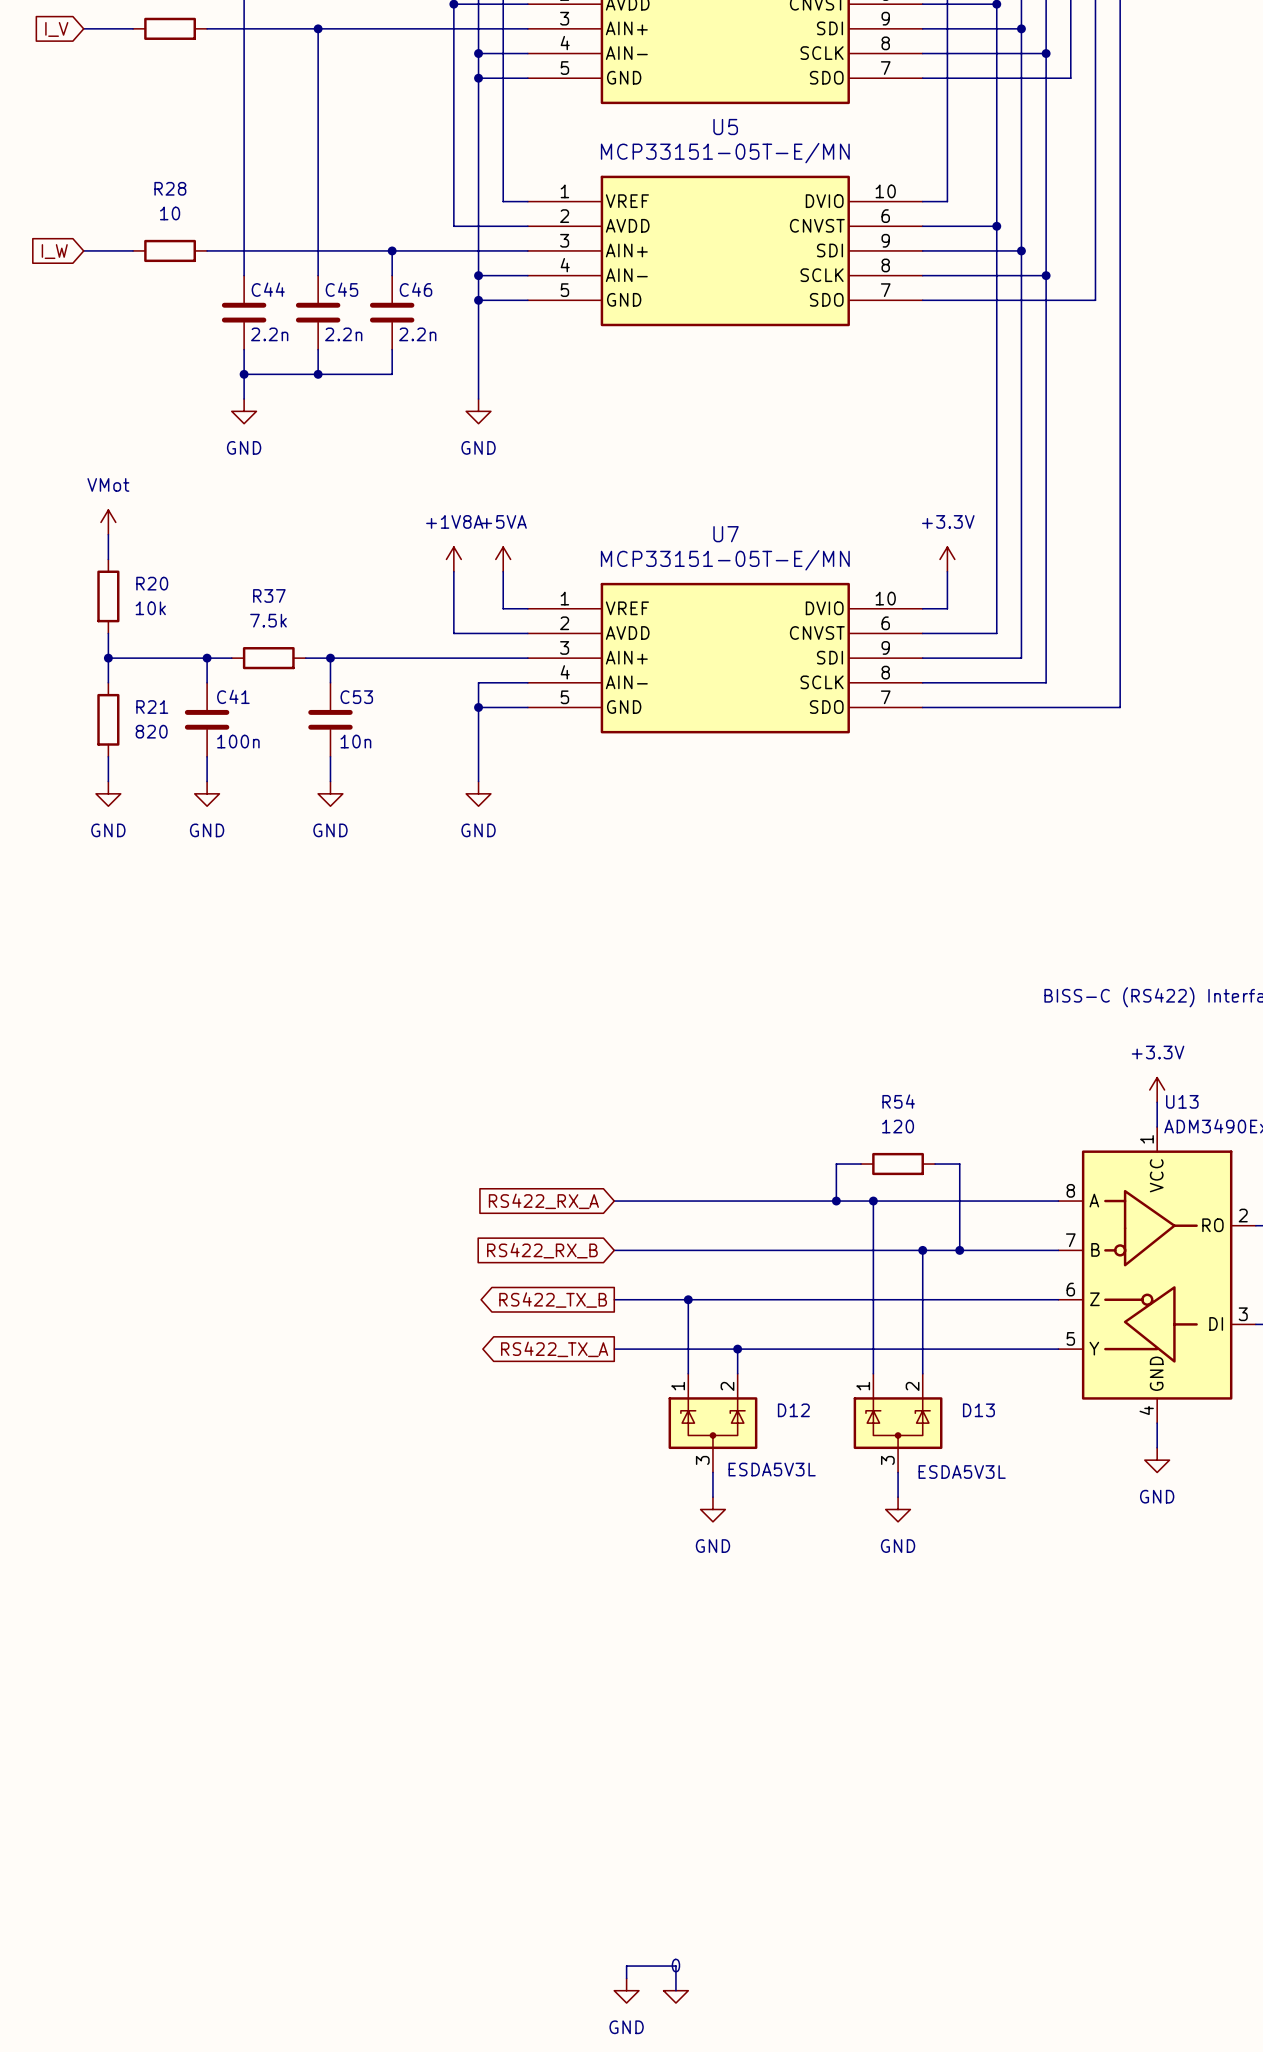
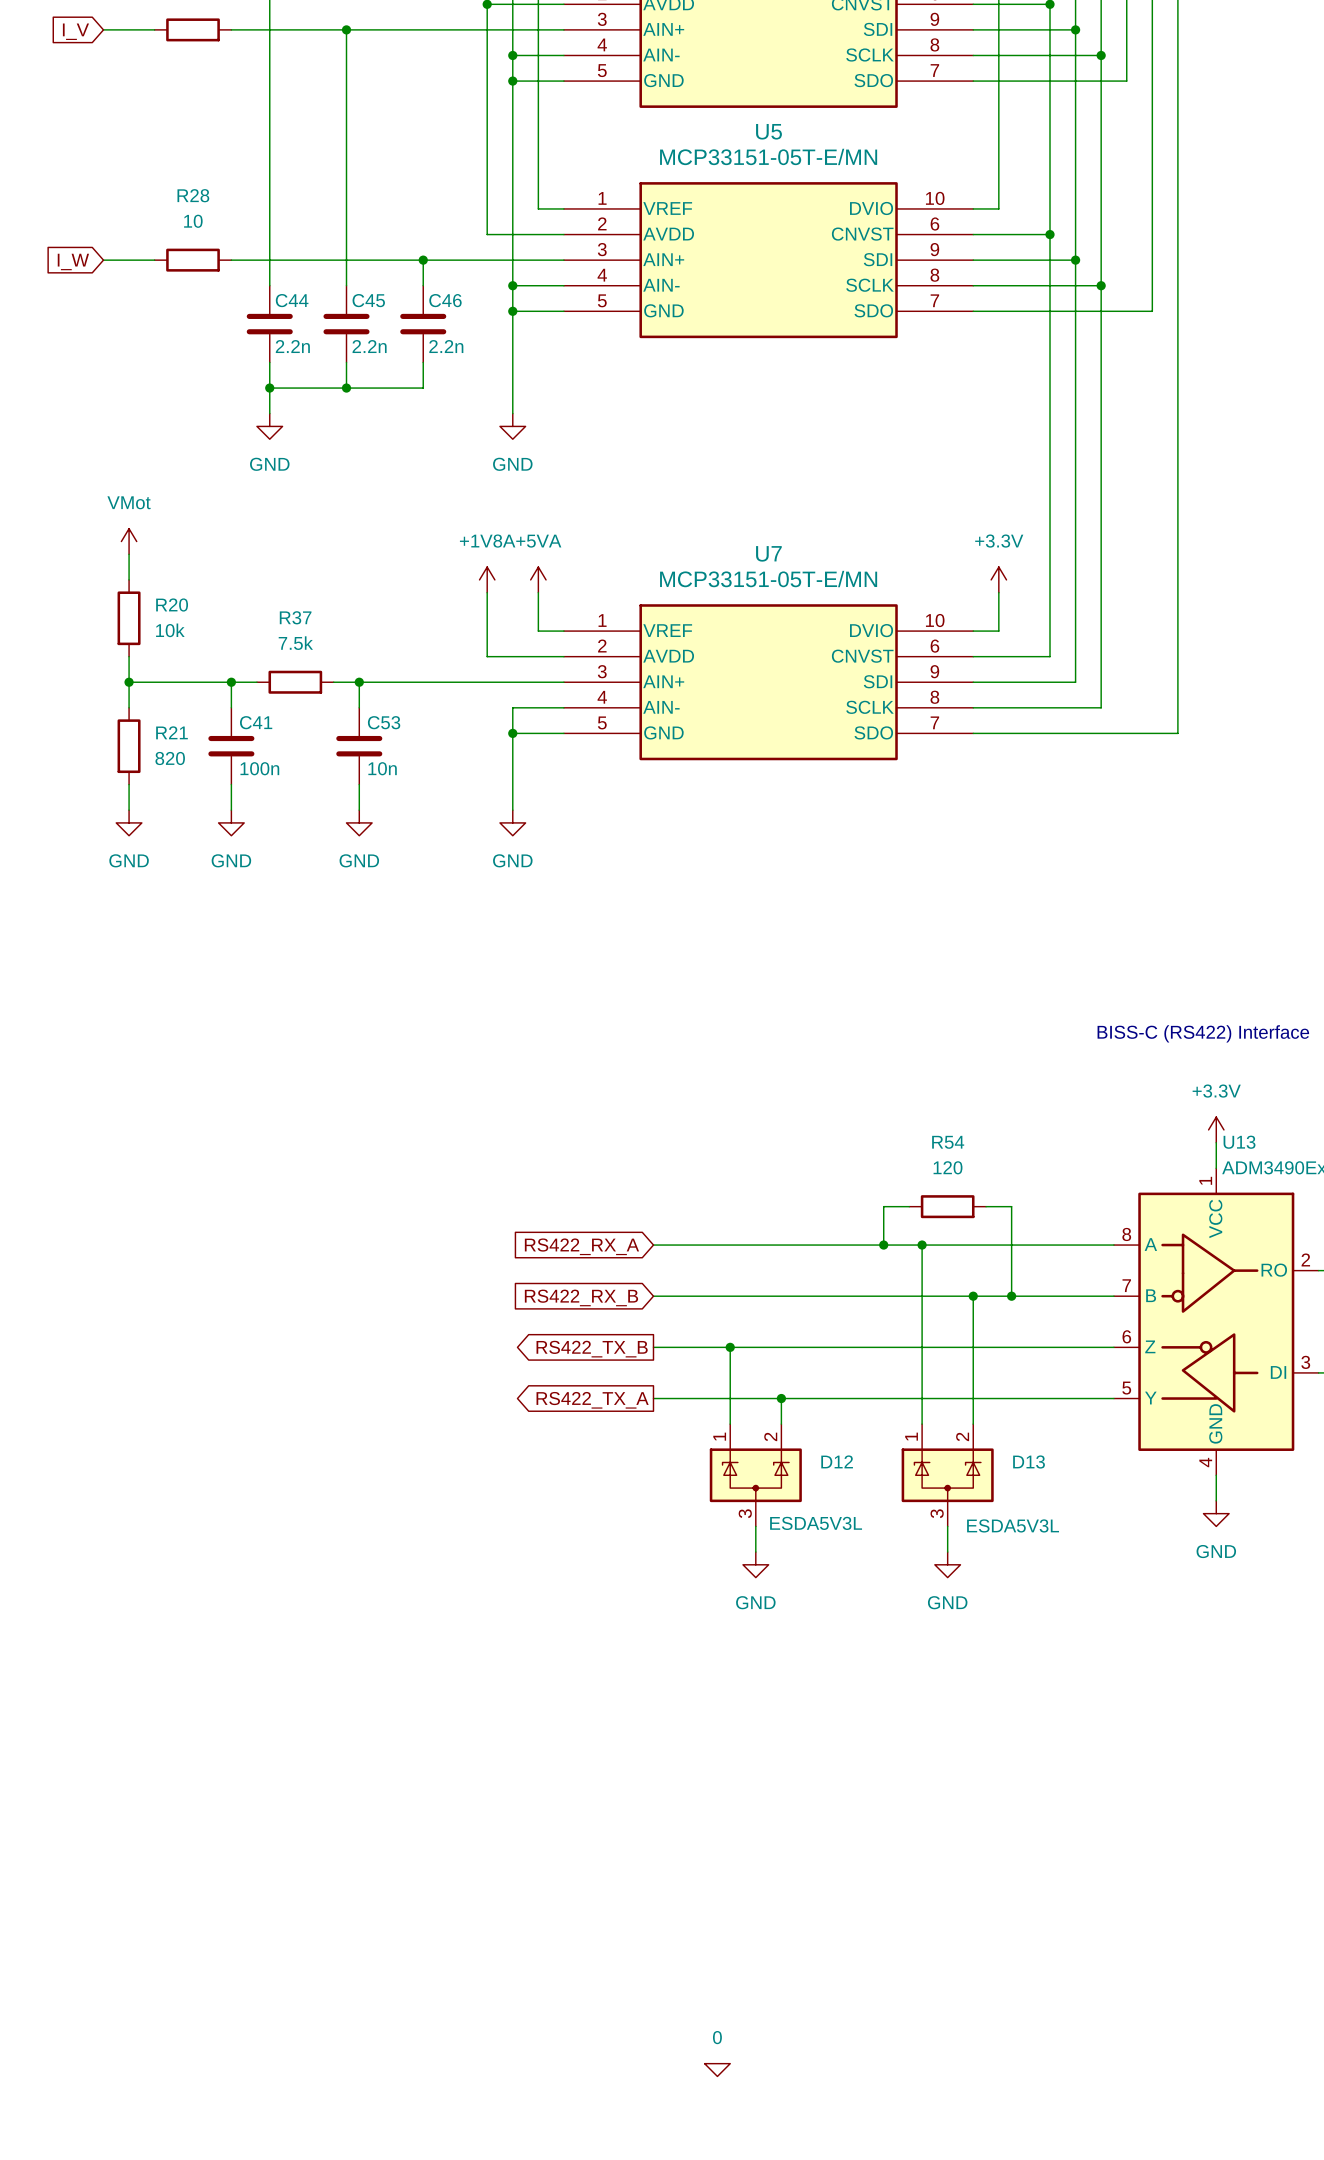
wire: (626, 1978) (626, 1966) (675, 1966) (675, 1990) -> none
power symbol: GND (626, 1990) -> none

